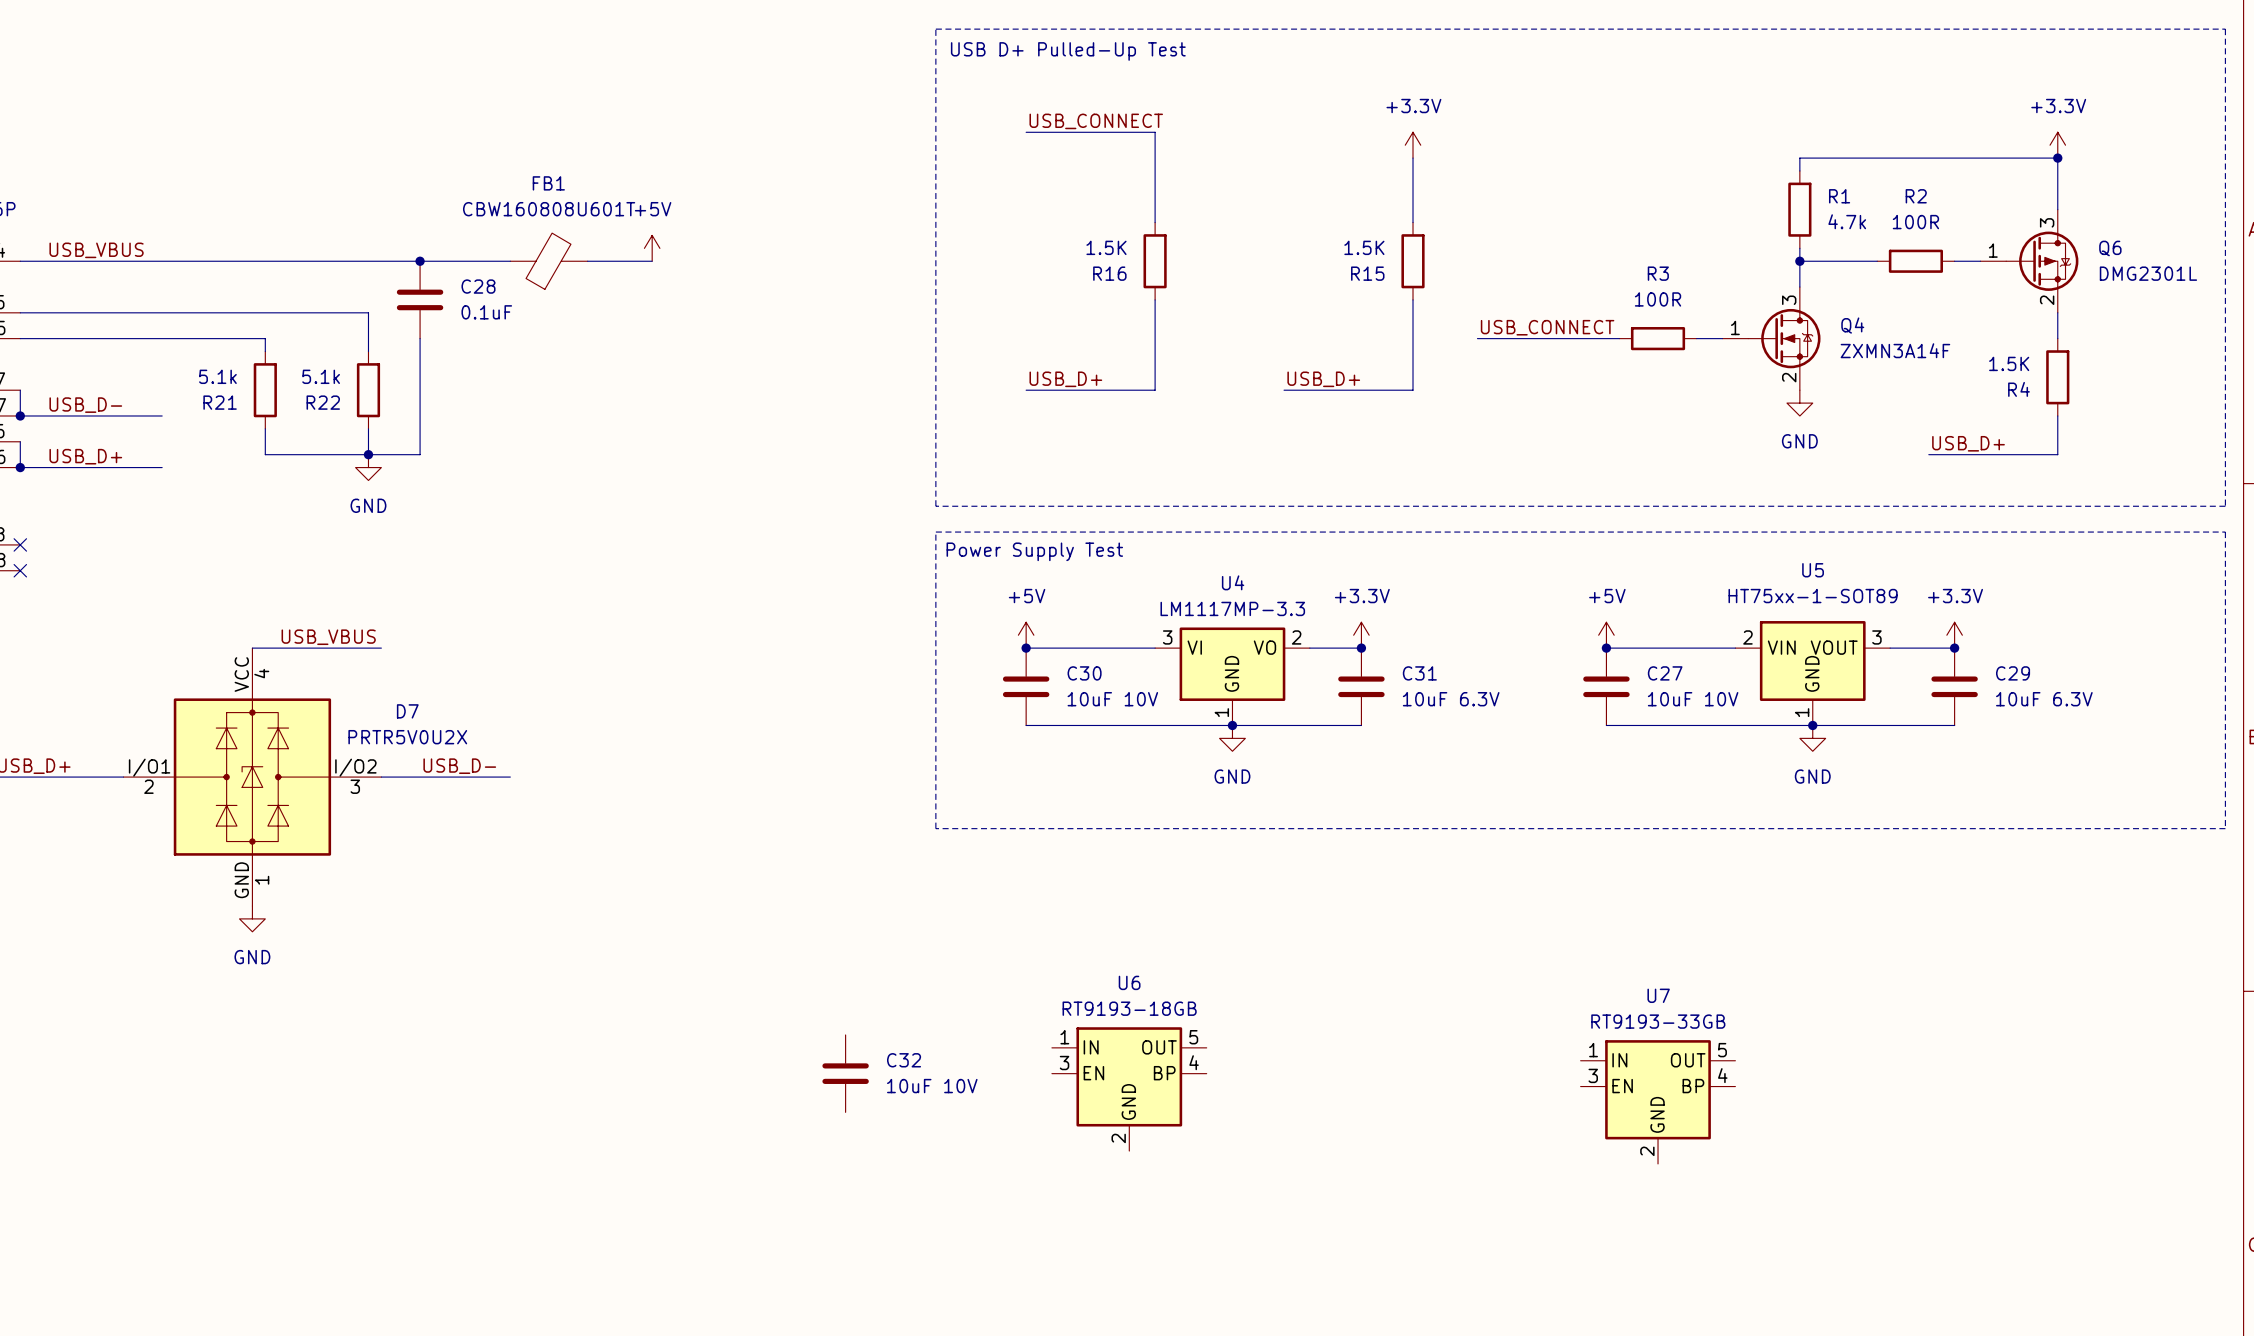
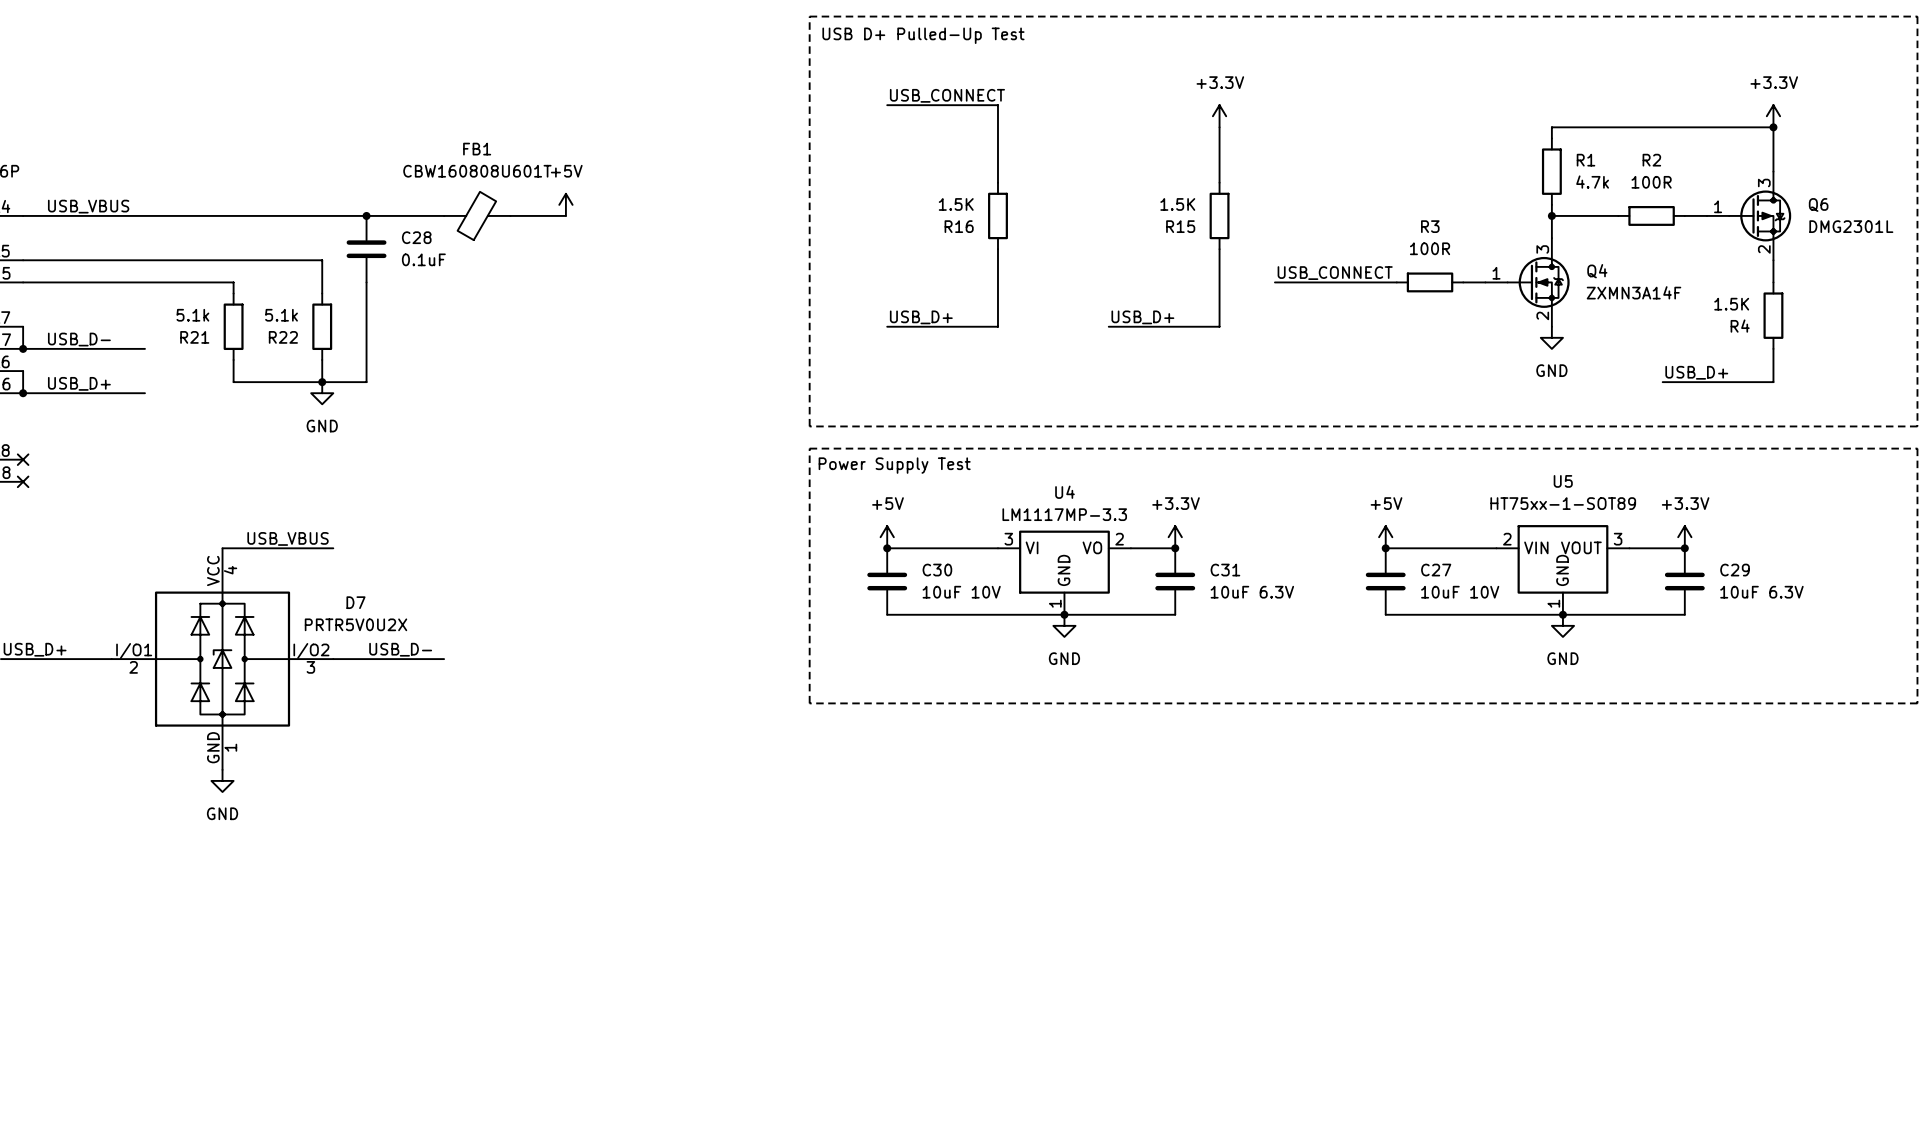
C32: 10uF 10V (845, 1073) -> none
U6: RT9193-18GB (1129, 1089) -> none
U7: RT9193-33GB (1658, 1102) -> none

